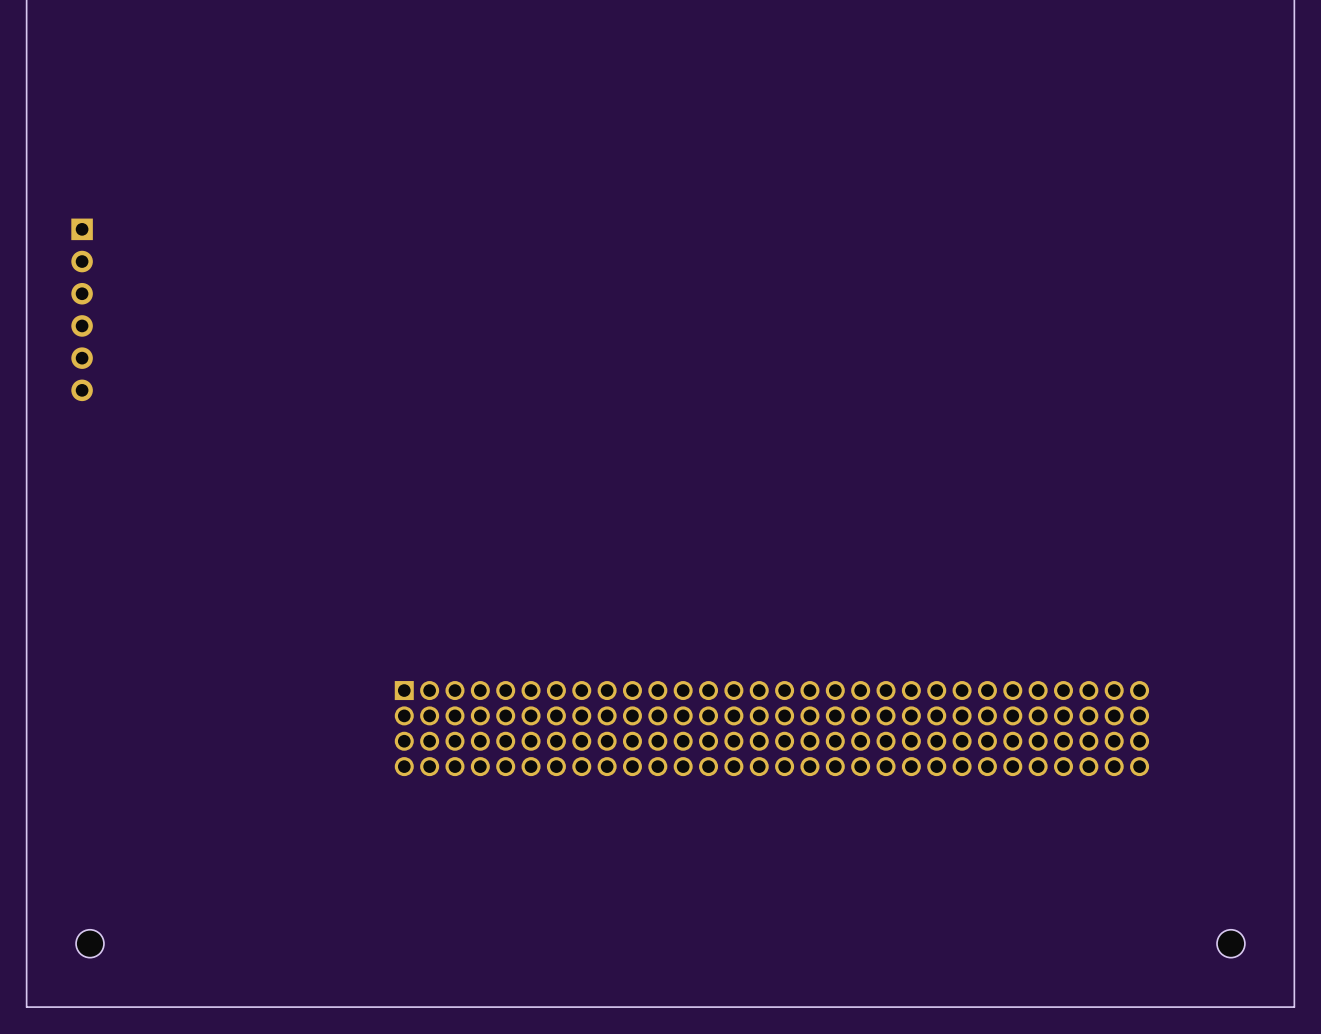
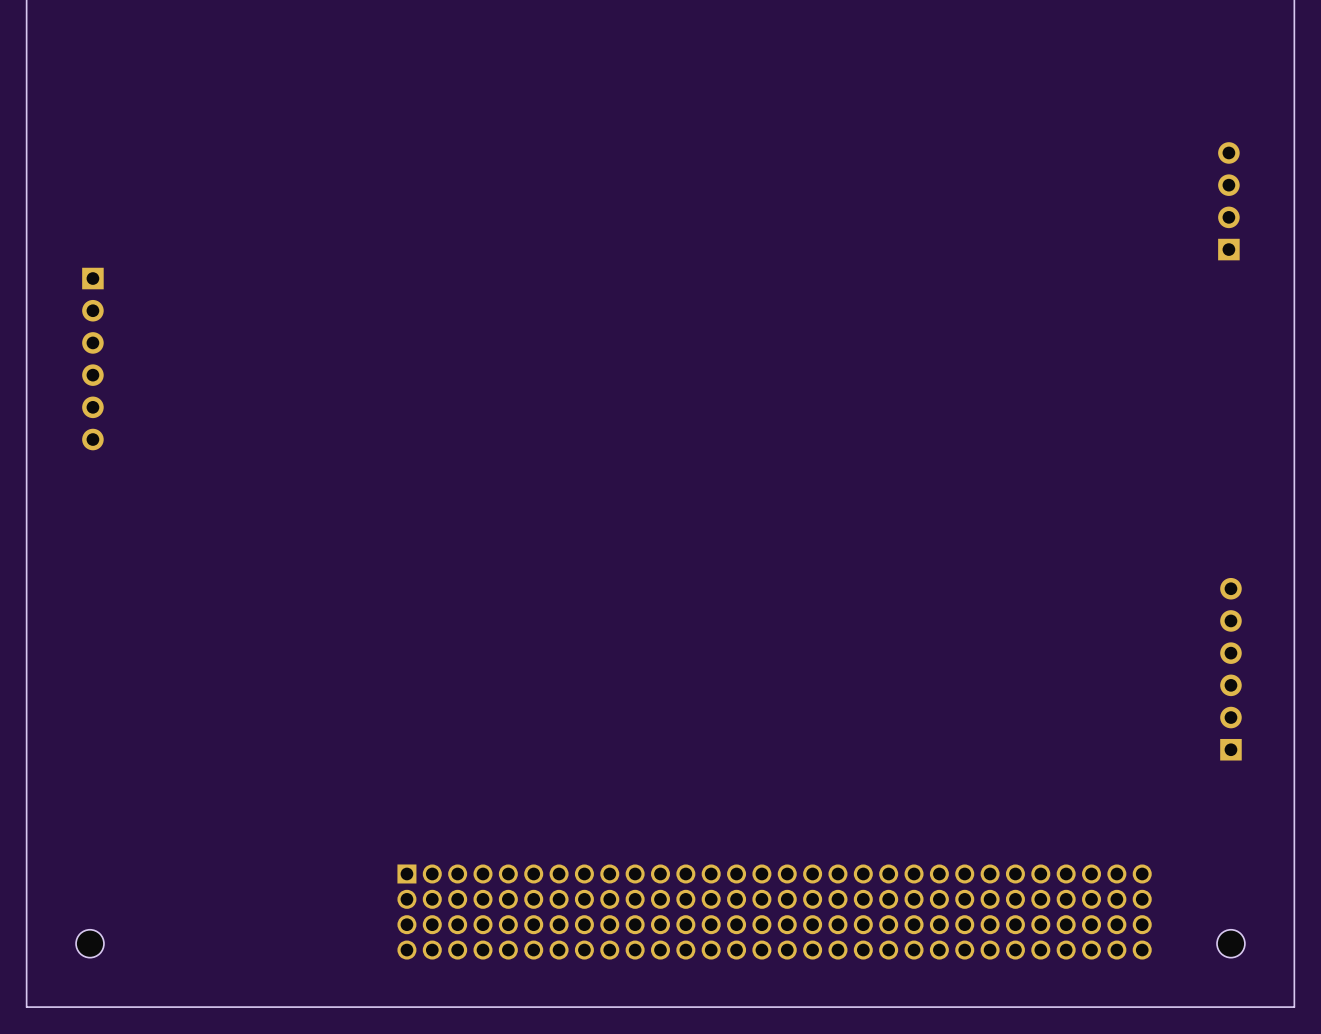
part: none -> (1228, 201)
part position: (82, 309) -> (92, 359)
part: none -> (1230, 669)
part position: (771, 728) -> (774, 912)

